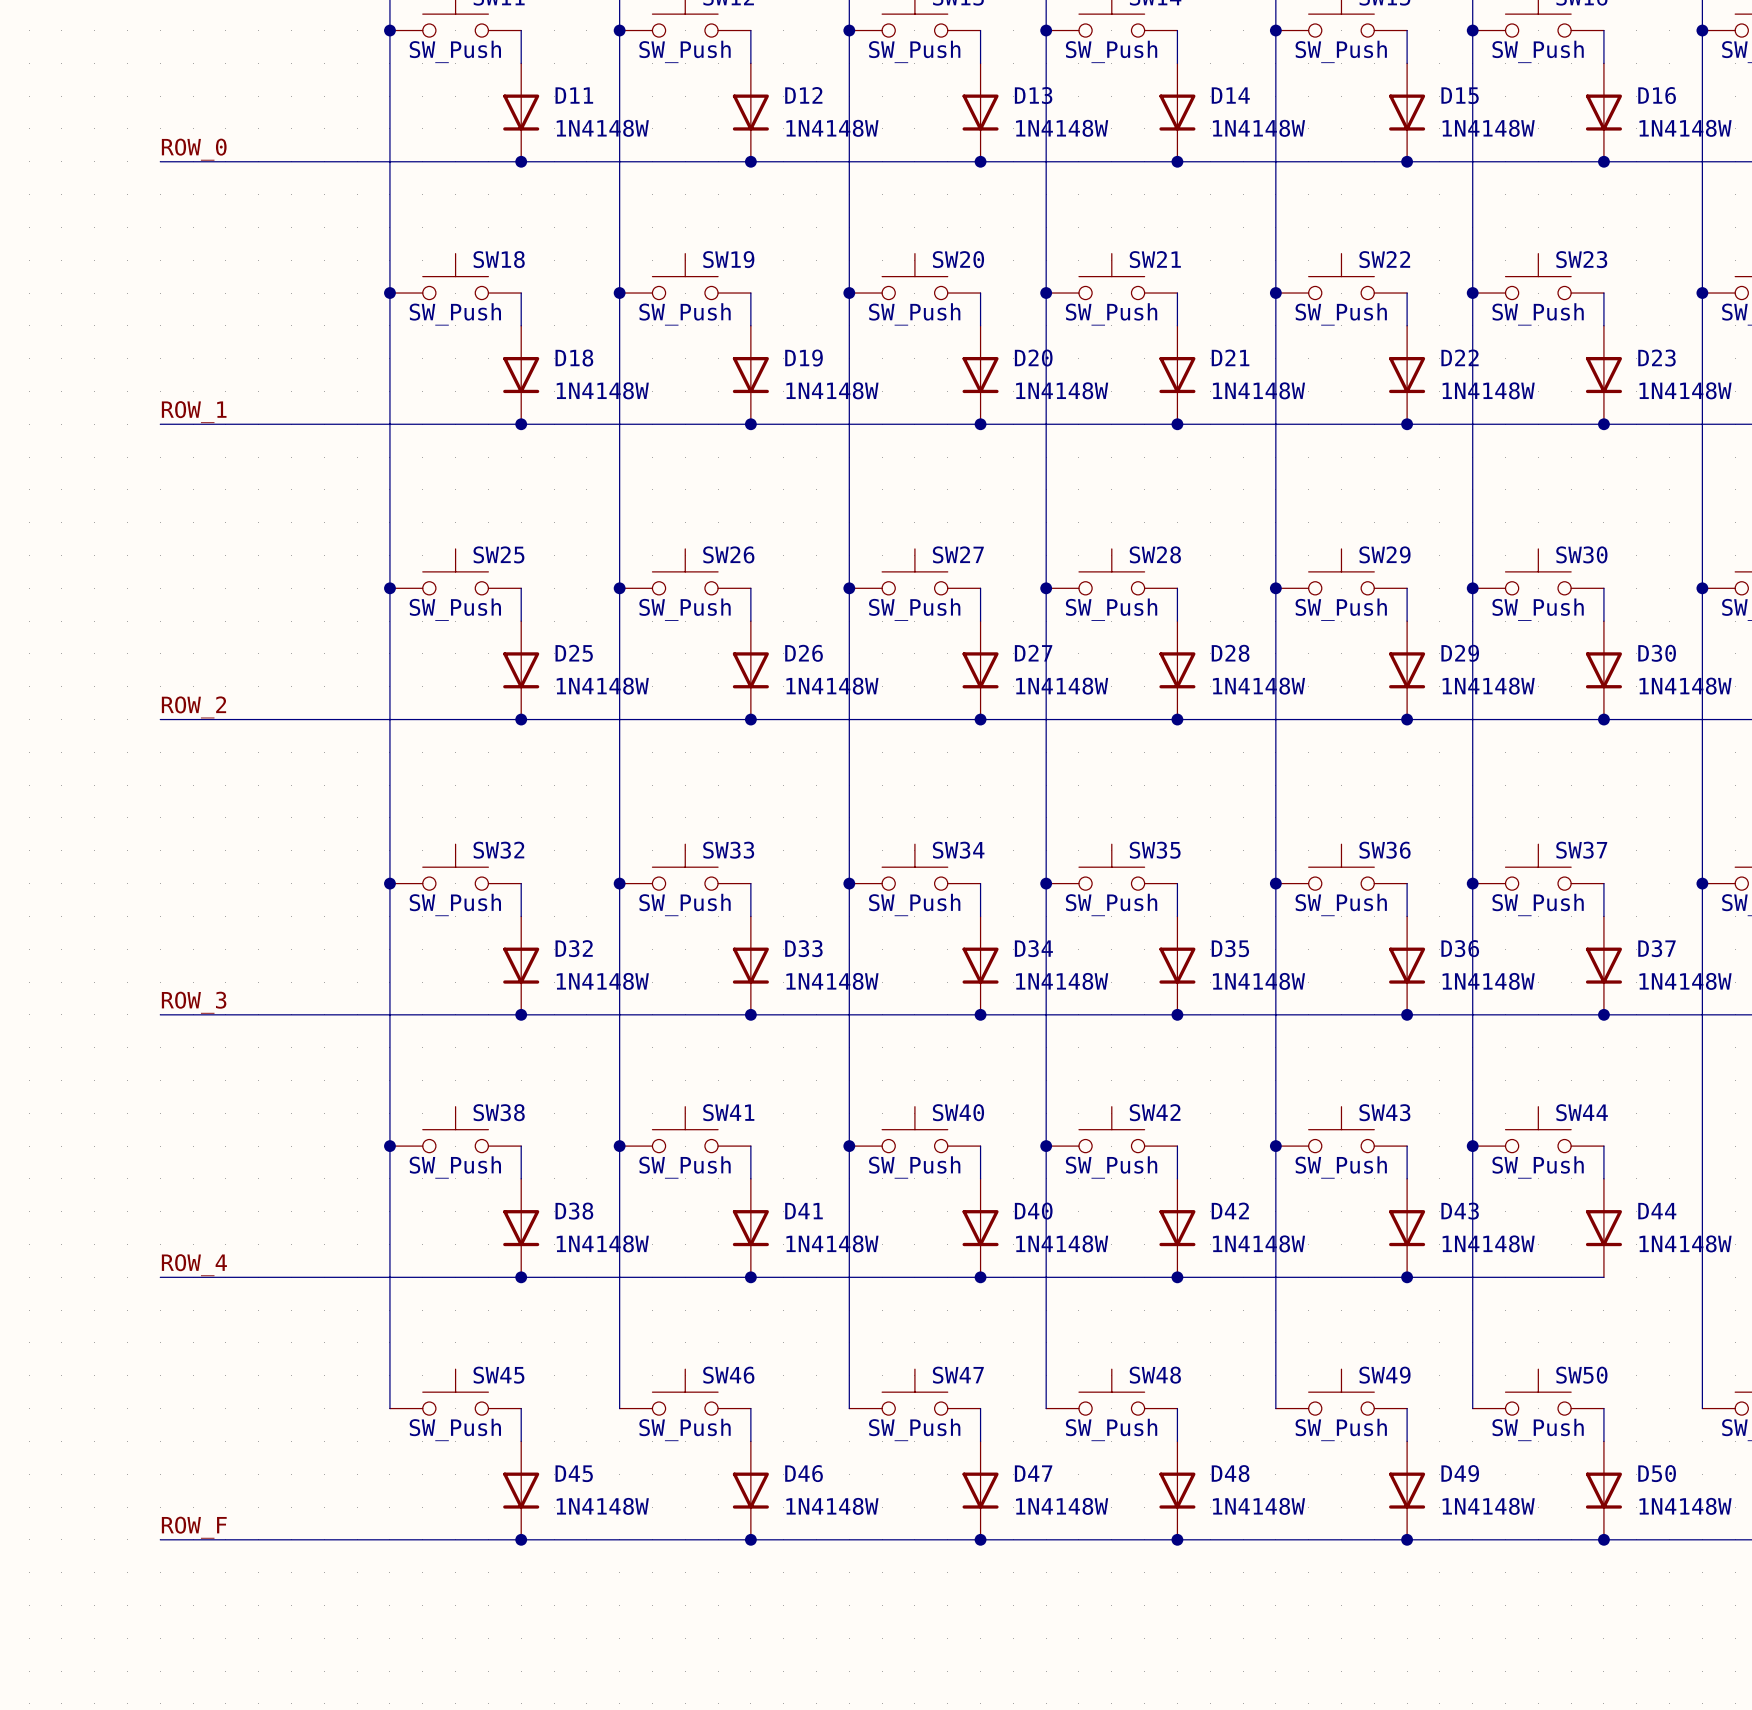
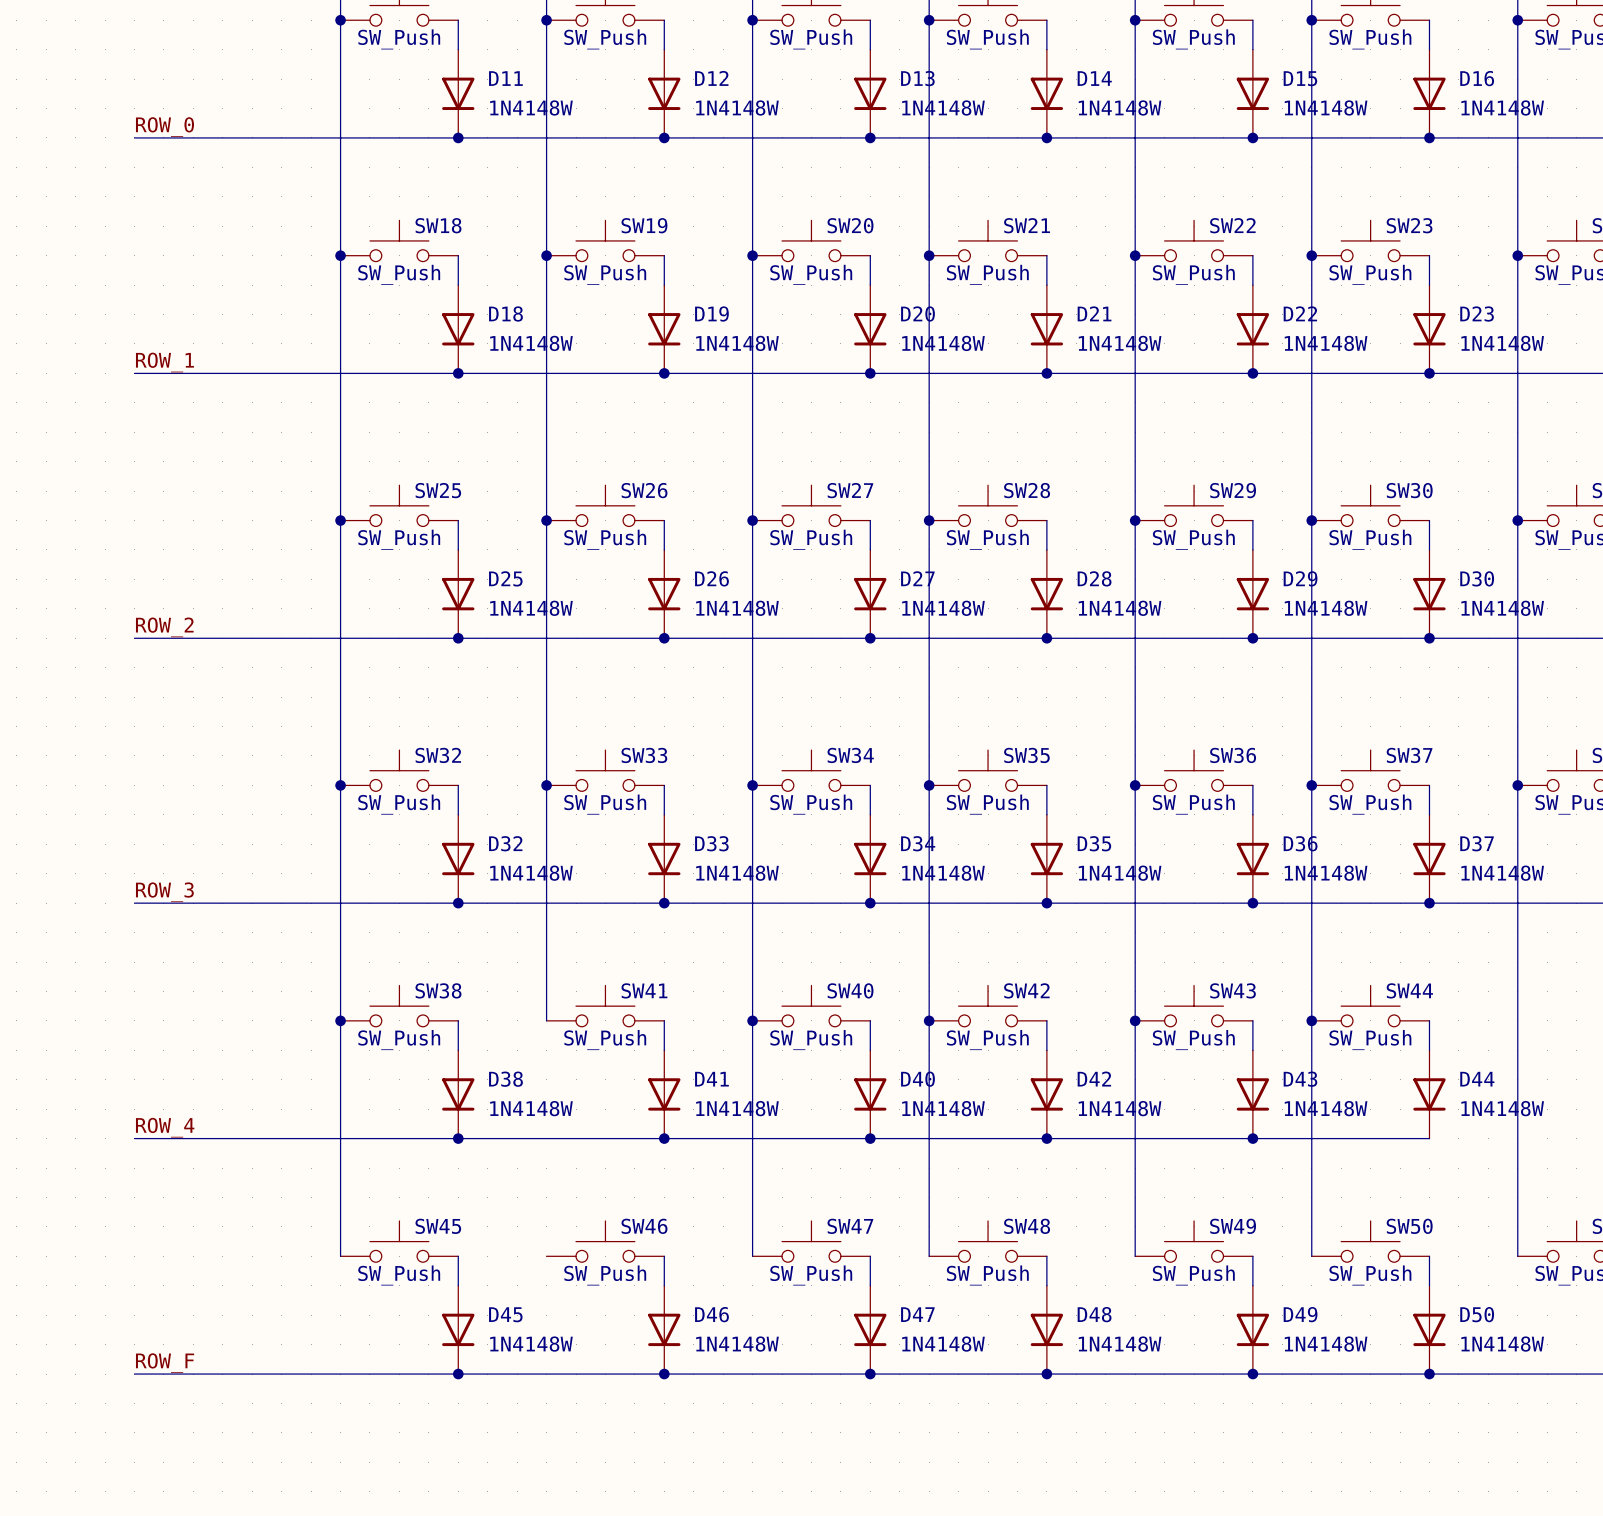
wire: (619, 1146) (619, 1408) -> none
junction: (619, 1146) -> none

